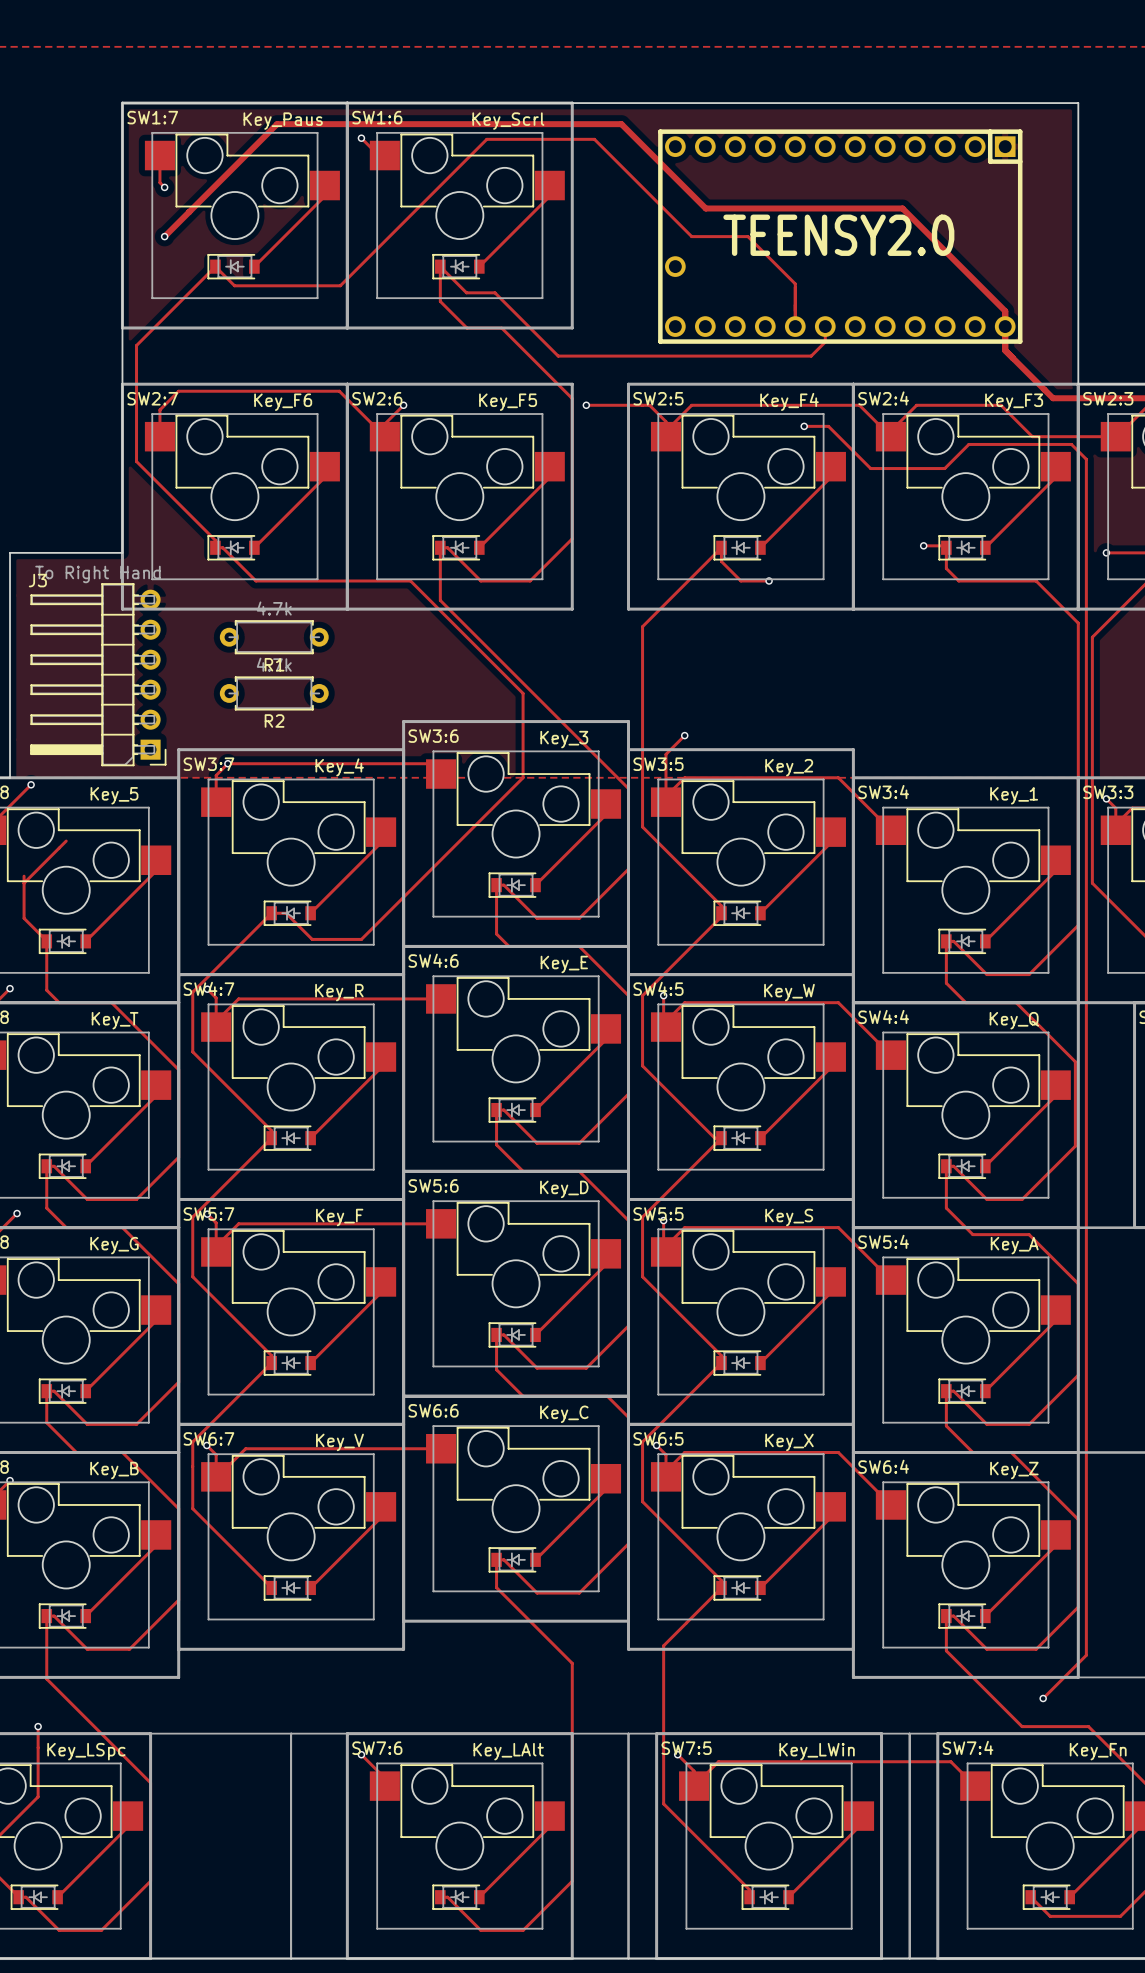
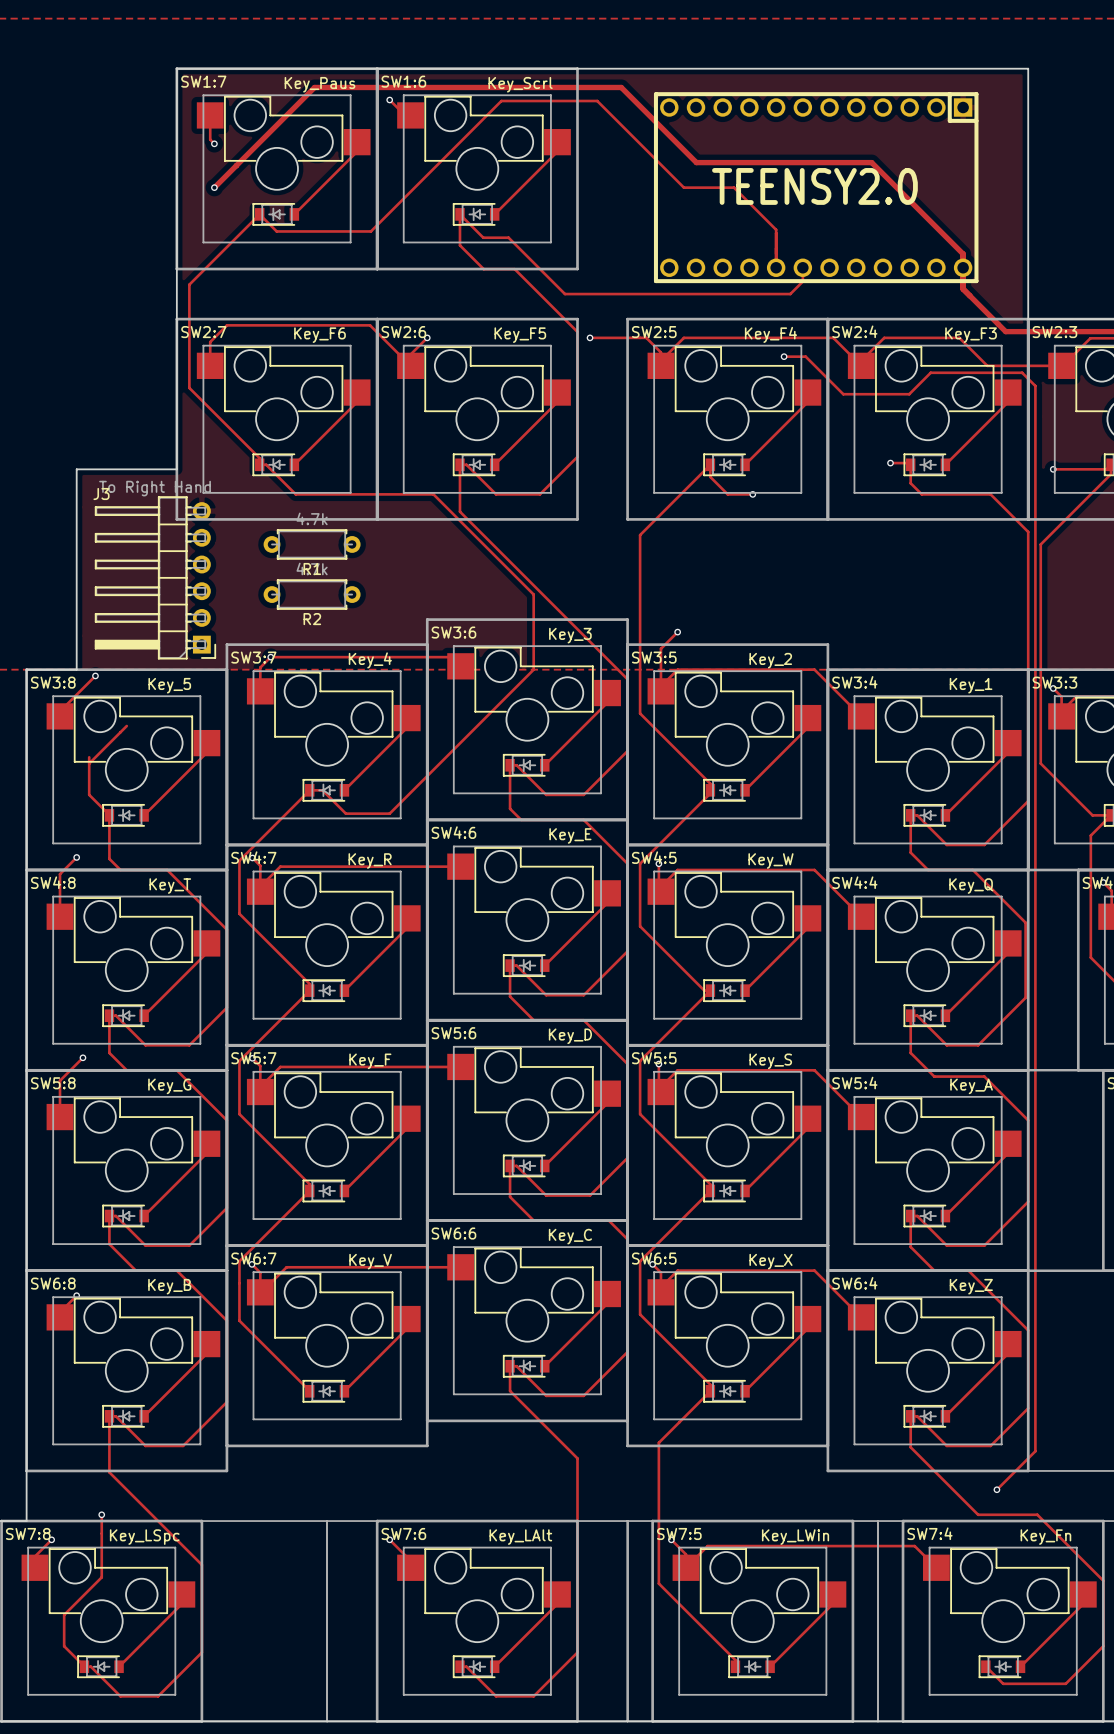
part footprint: [658, 129, 1023, 344] -> [653, 92, 979, 284]

